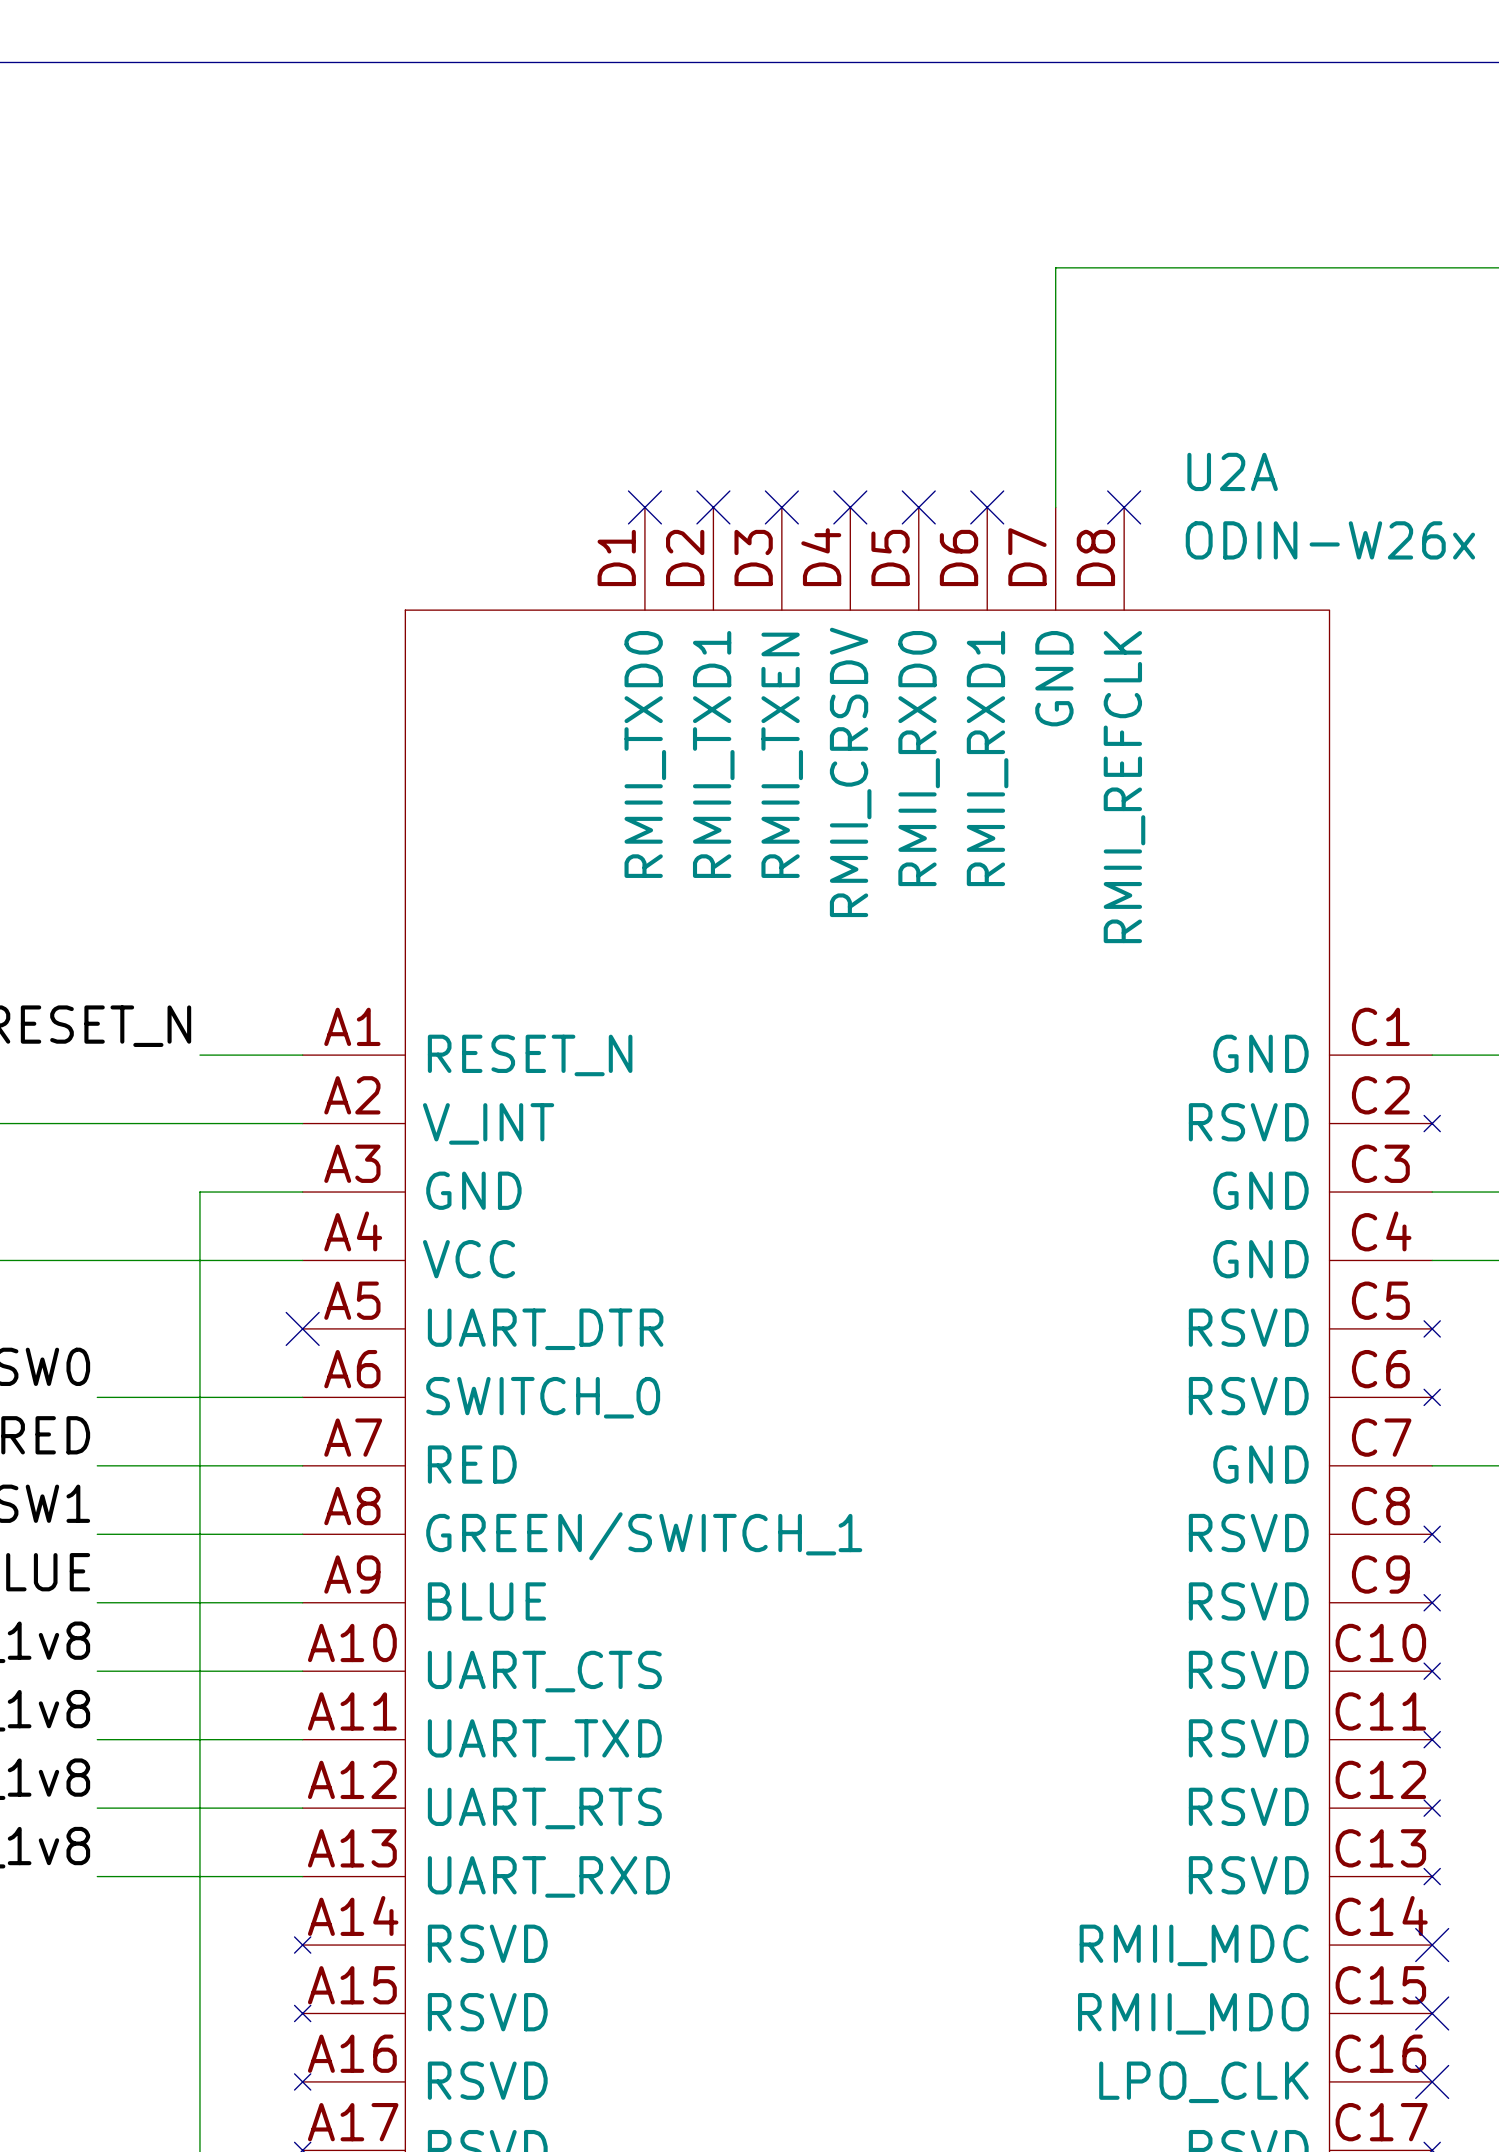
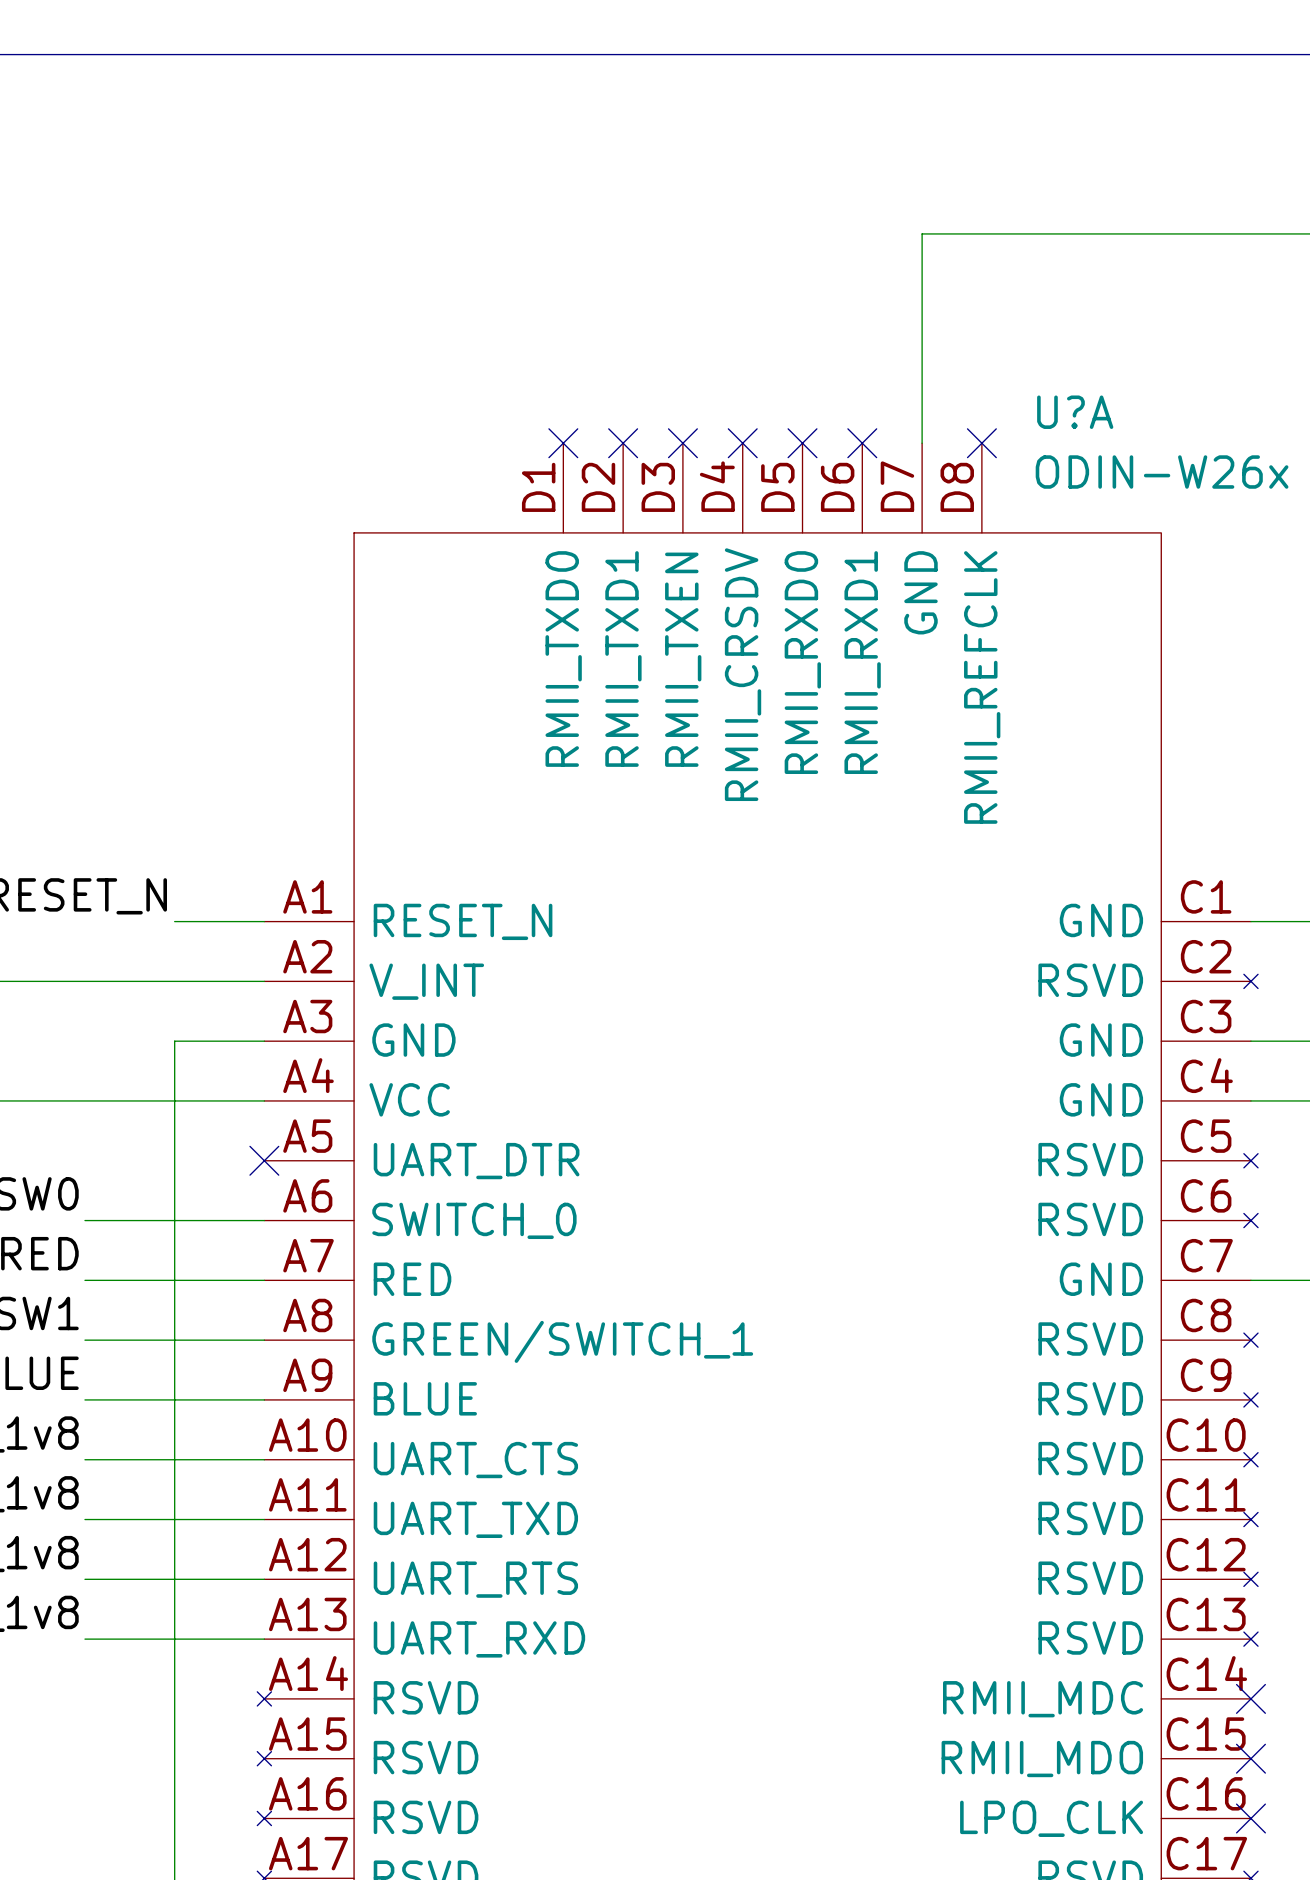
U2A name: U2A (1232, 471) -> U?A (1075, 412)

